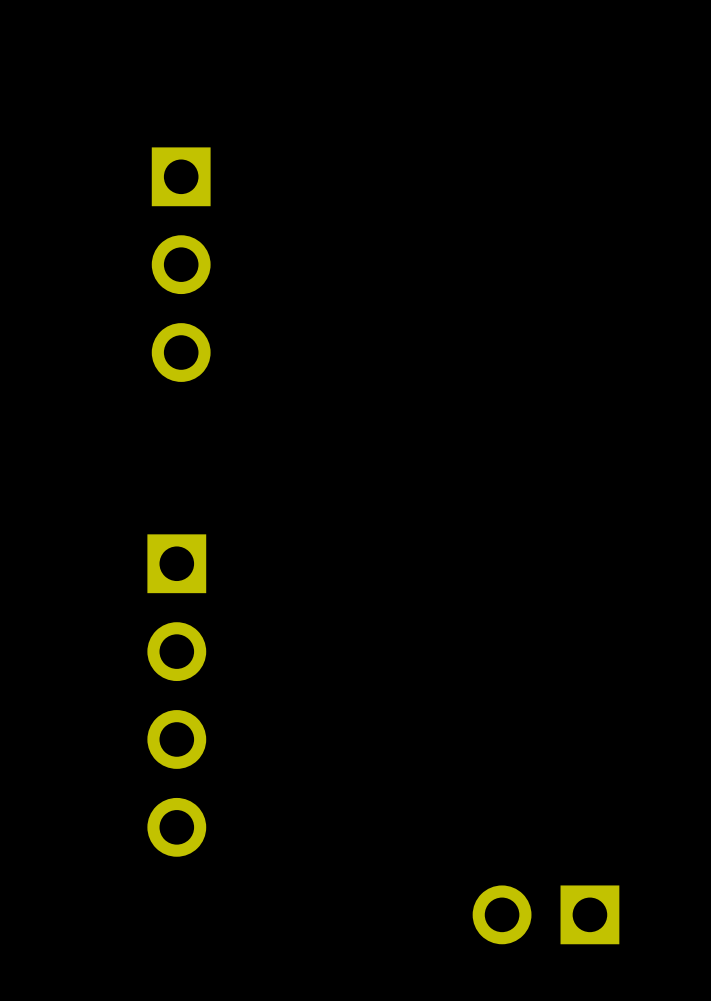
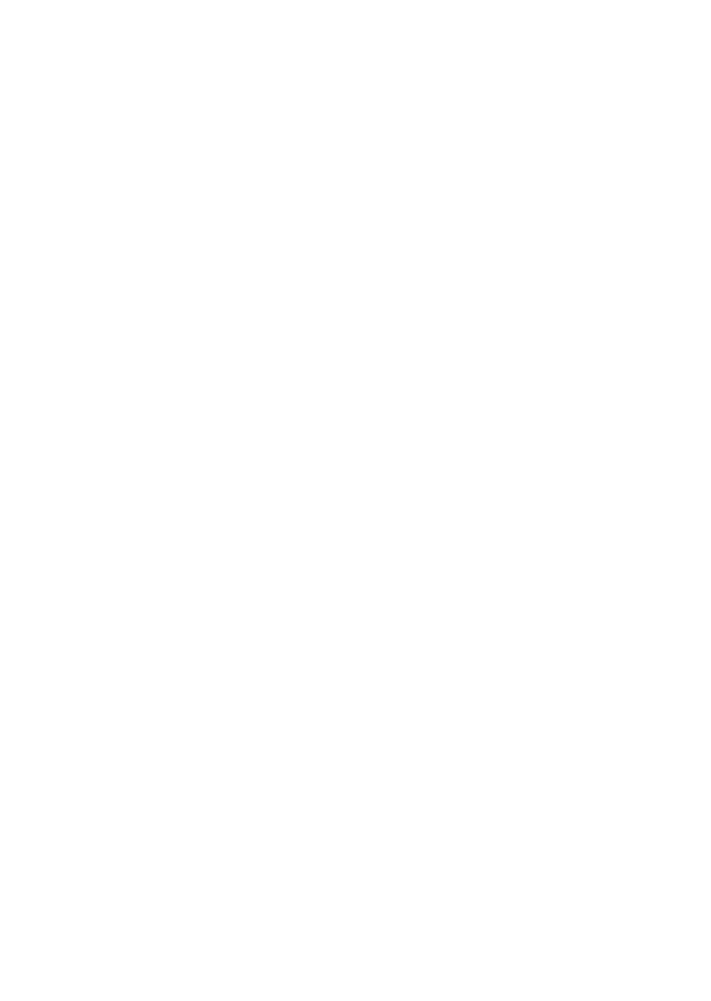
part: (181, 264) -> none
part: (176, 695) -> none
part: (546, 914) -> none

